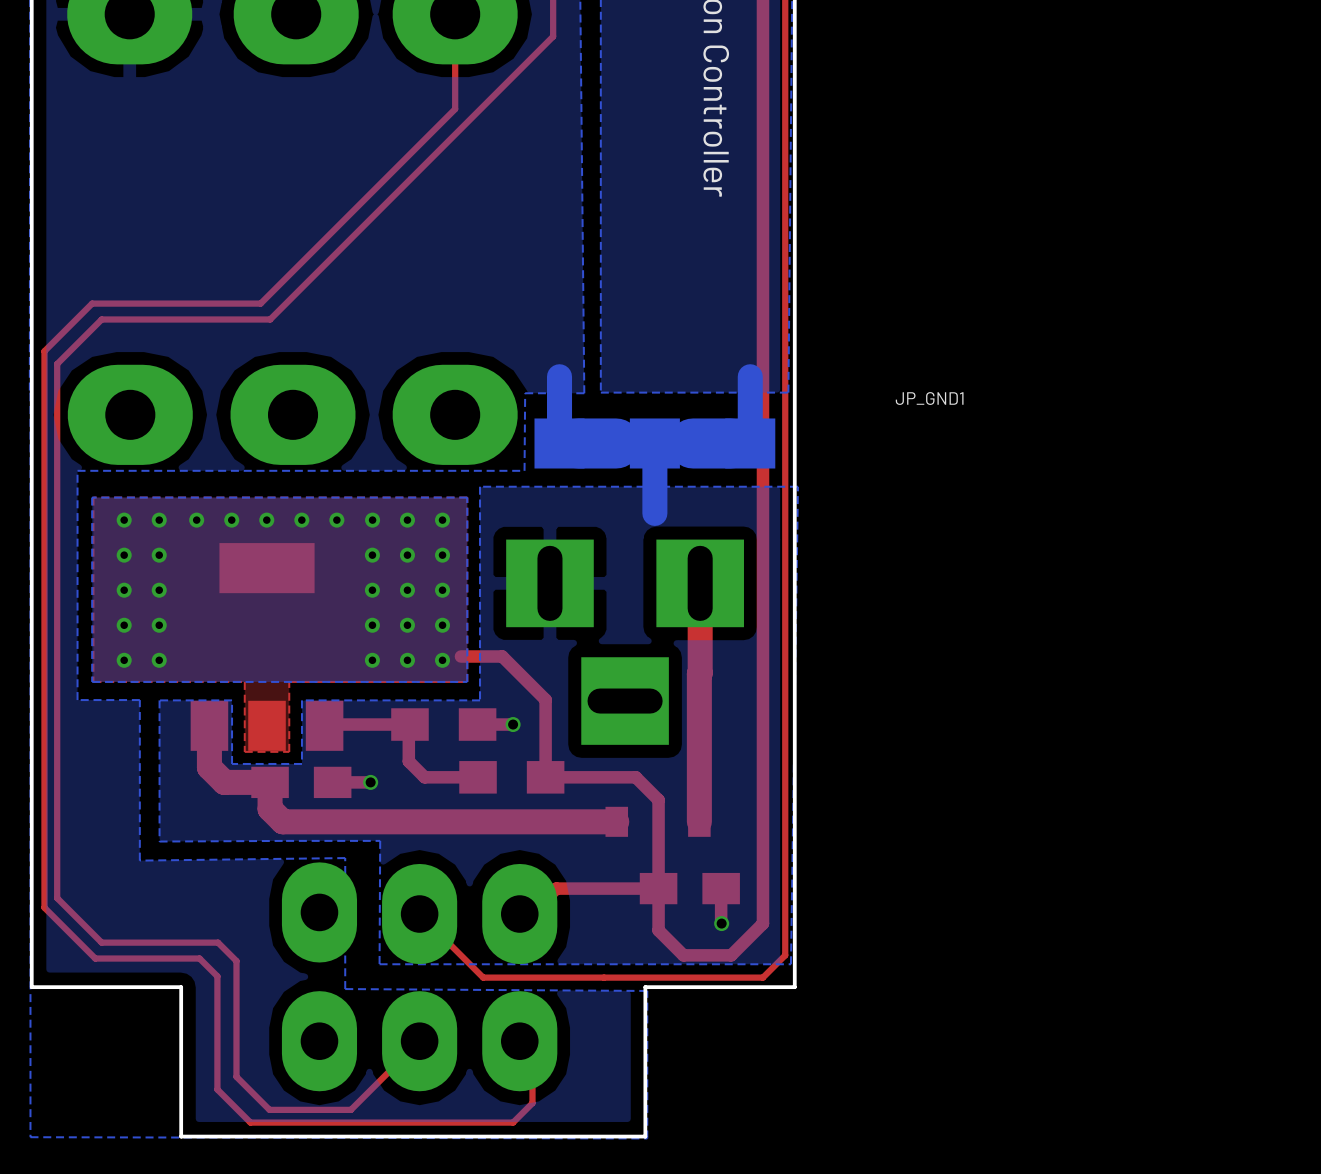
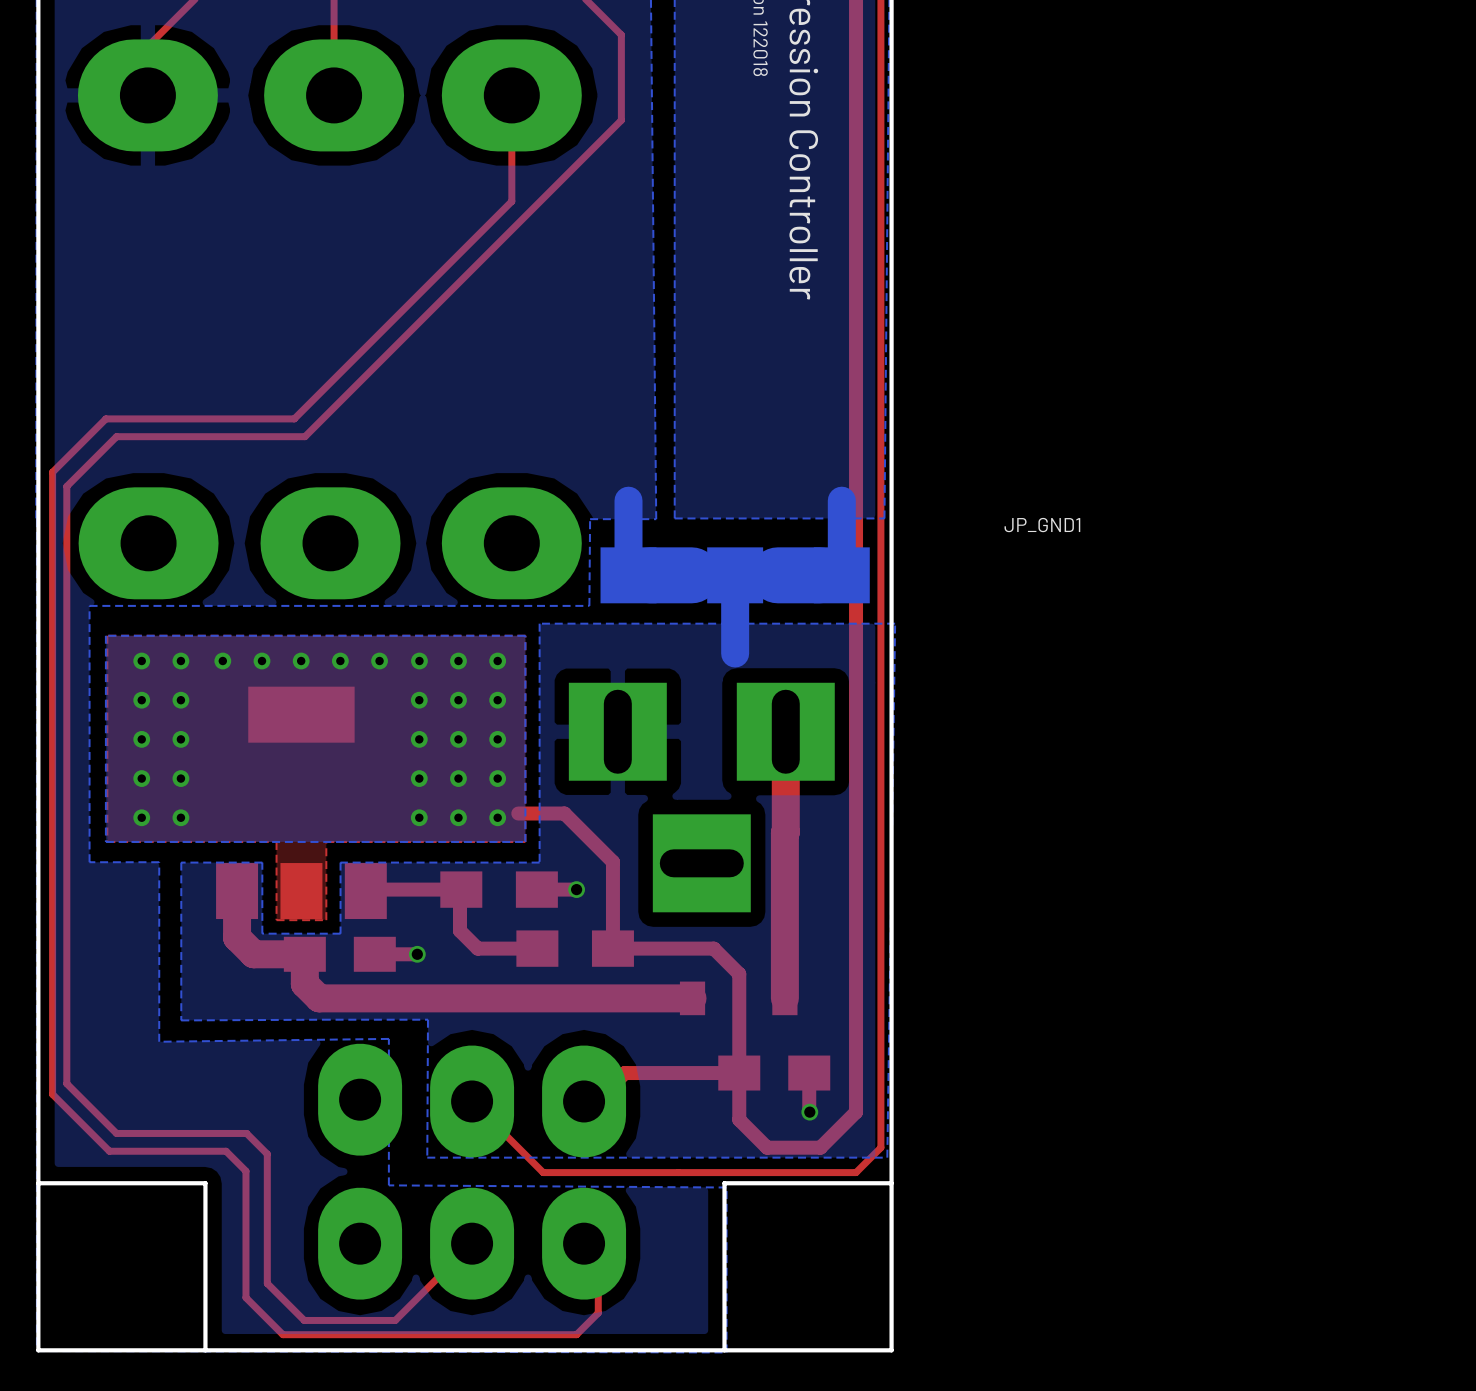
board edge: none -> (38, 1183) (38, 1350) (205, 1350)
board edge: none -> (891, 1183) (891, 1350) (724, 1350)

